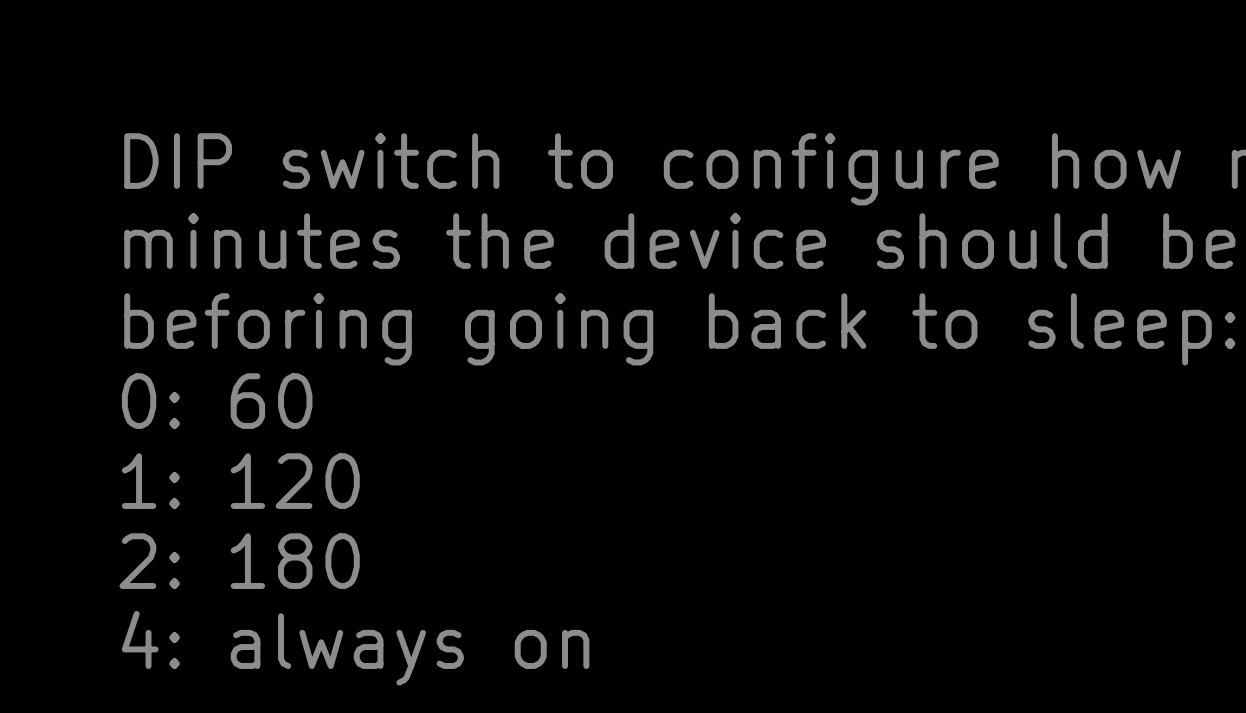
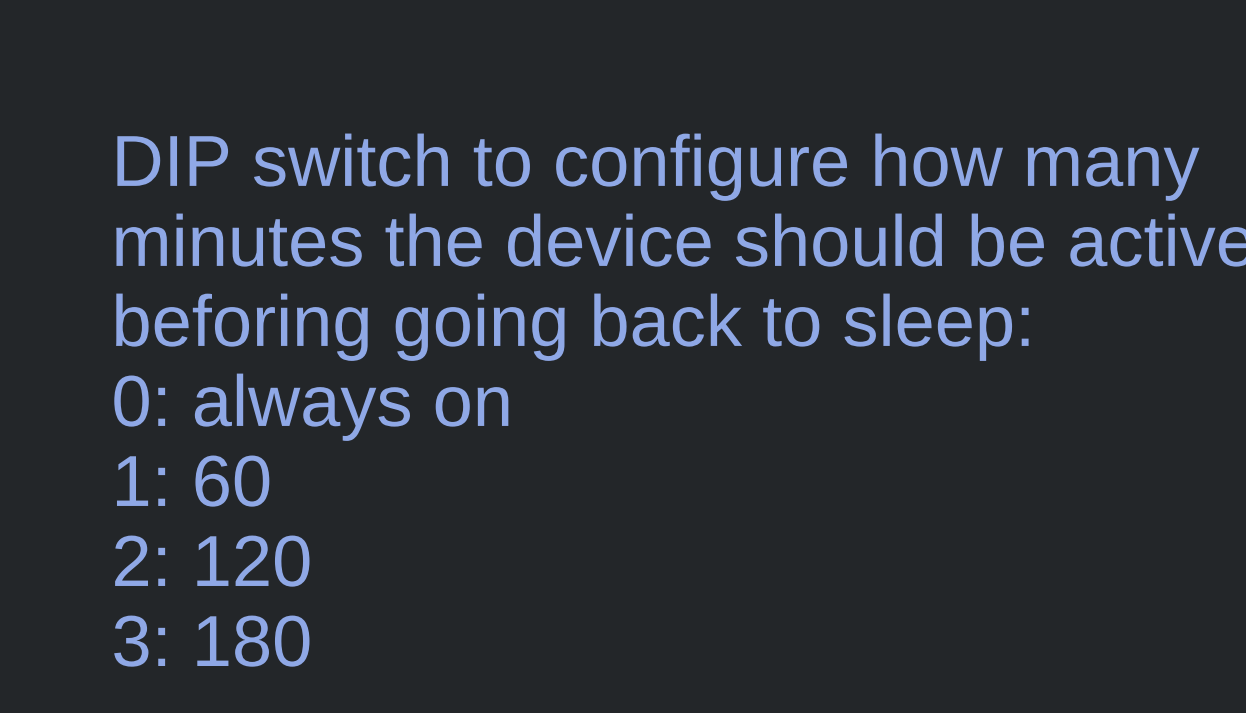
text: 0: 60 (217, 401) -> 0: always on (311, 407)
text: 1: 120 (240, 481) -> 1: 60 (193, 481)
text: 2: 180 (239, 561) -> 2: 120 (212, 561)
text: 4: always on (355, 648) -> 3: 180 (211, 641)

